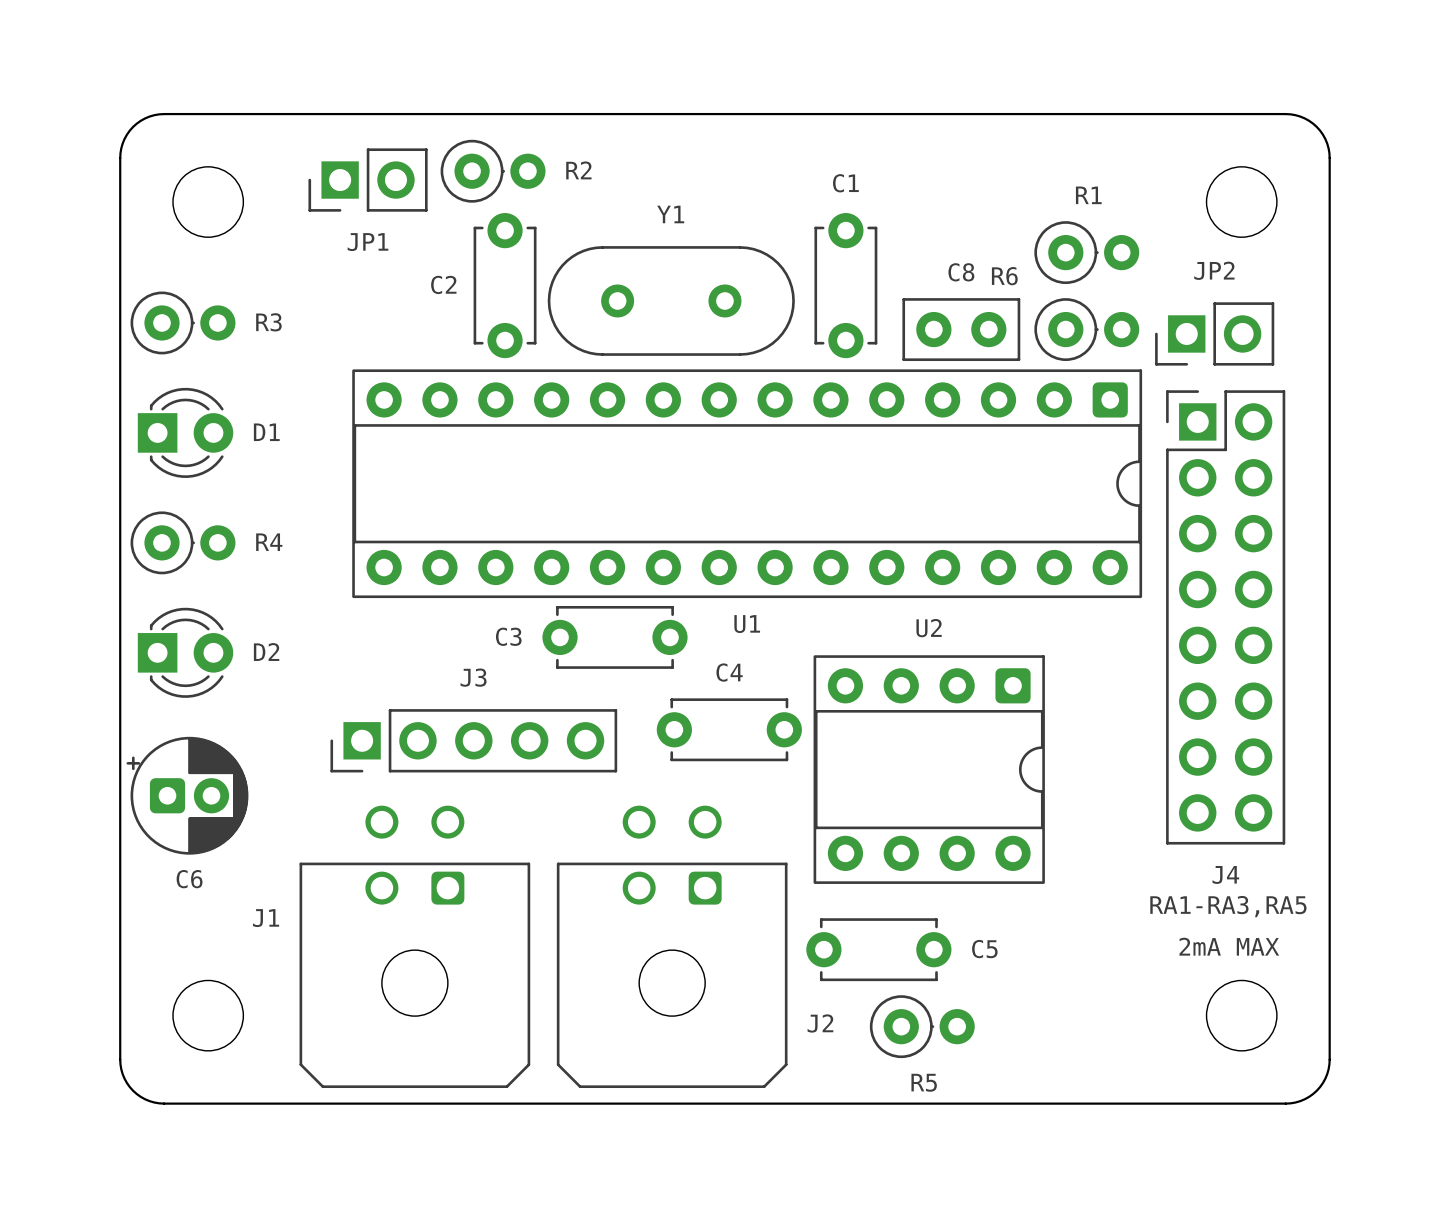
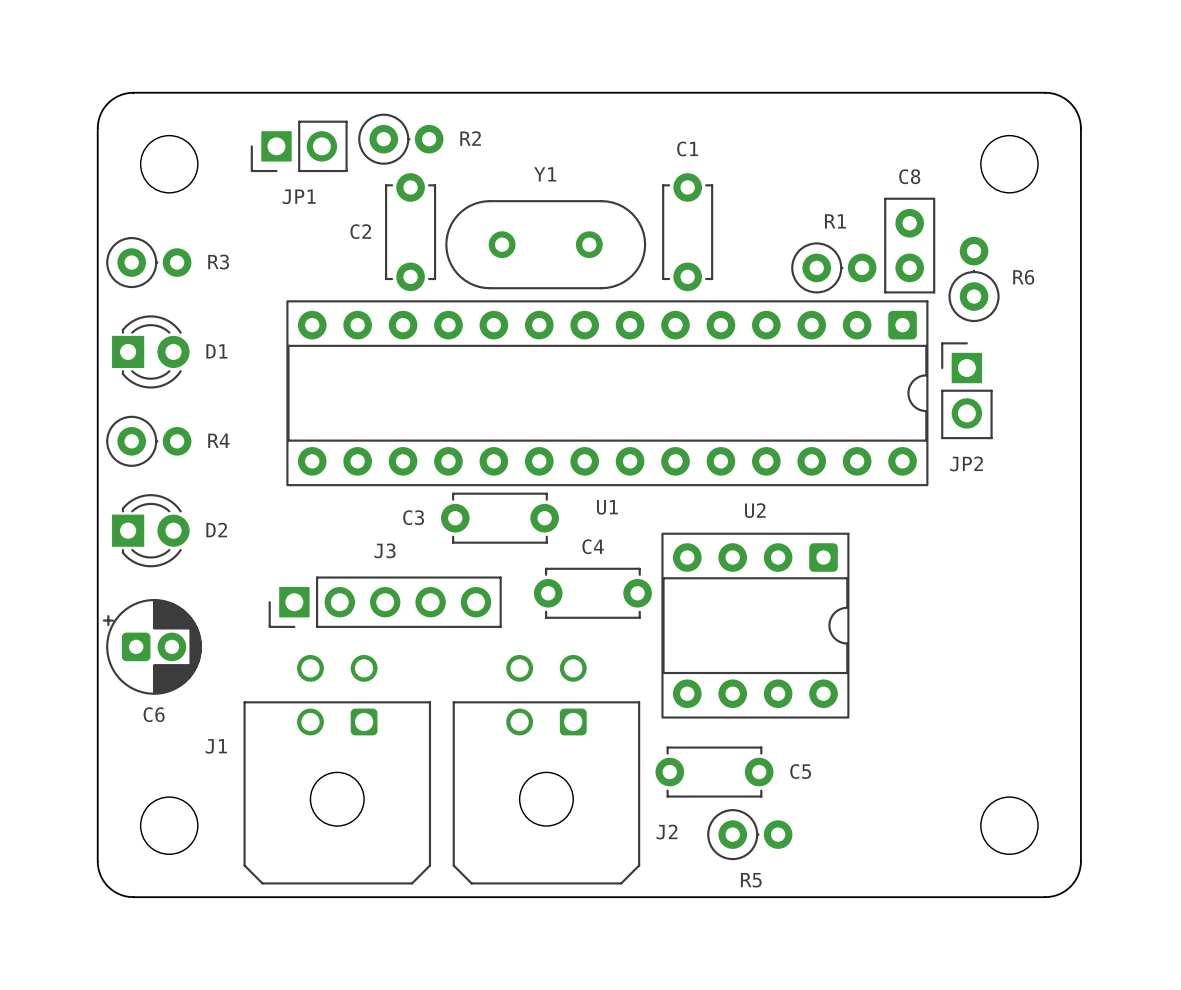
R1 position: (1086, 252) -> (833, 267)
JP2 name position: JP2 (1214, 270) -> JP2 (966, 463)
R6 name position: R6 (1004, 276) -> R6 (1023, 277)
C8 rotation: 0° (961, 329) -> 90° clockwise (909, 245)
C8 position: (961, 329) -> (909, 245)
R6 rotation: 0° (1086, 329) -> 90° counterclockwise (974, 279)
R6 position: (1086, 329) -> (974, 279)
JP2 rotation: 0° (1214, 333) -> 90° clockwise (966, 390)
JP2 position: (1214, 333) -> (966, 390)
J4: (1225, 617) -> none
text: RA1-RA3,RA5 (1228, 906) -> none
text: 2mA MAX (1229, 946) -> none

